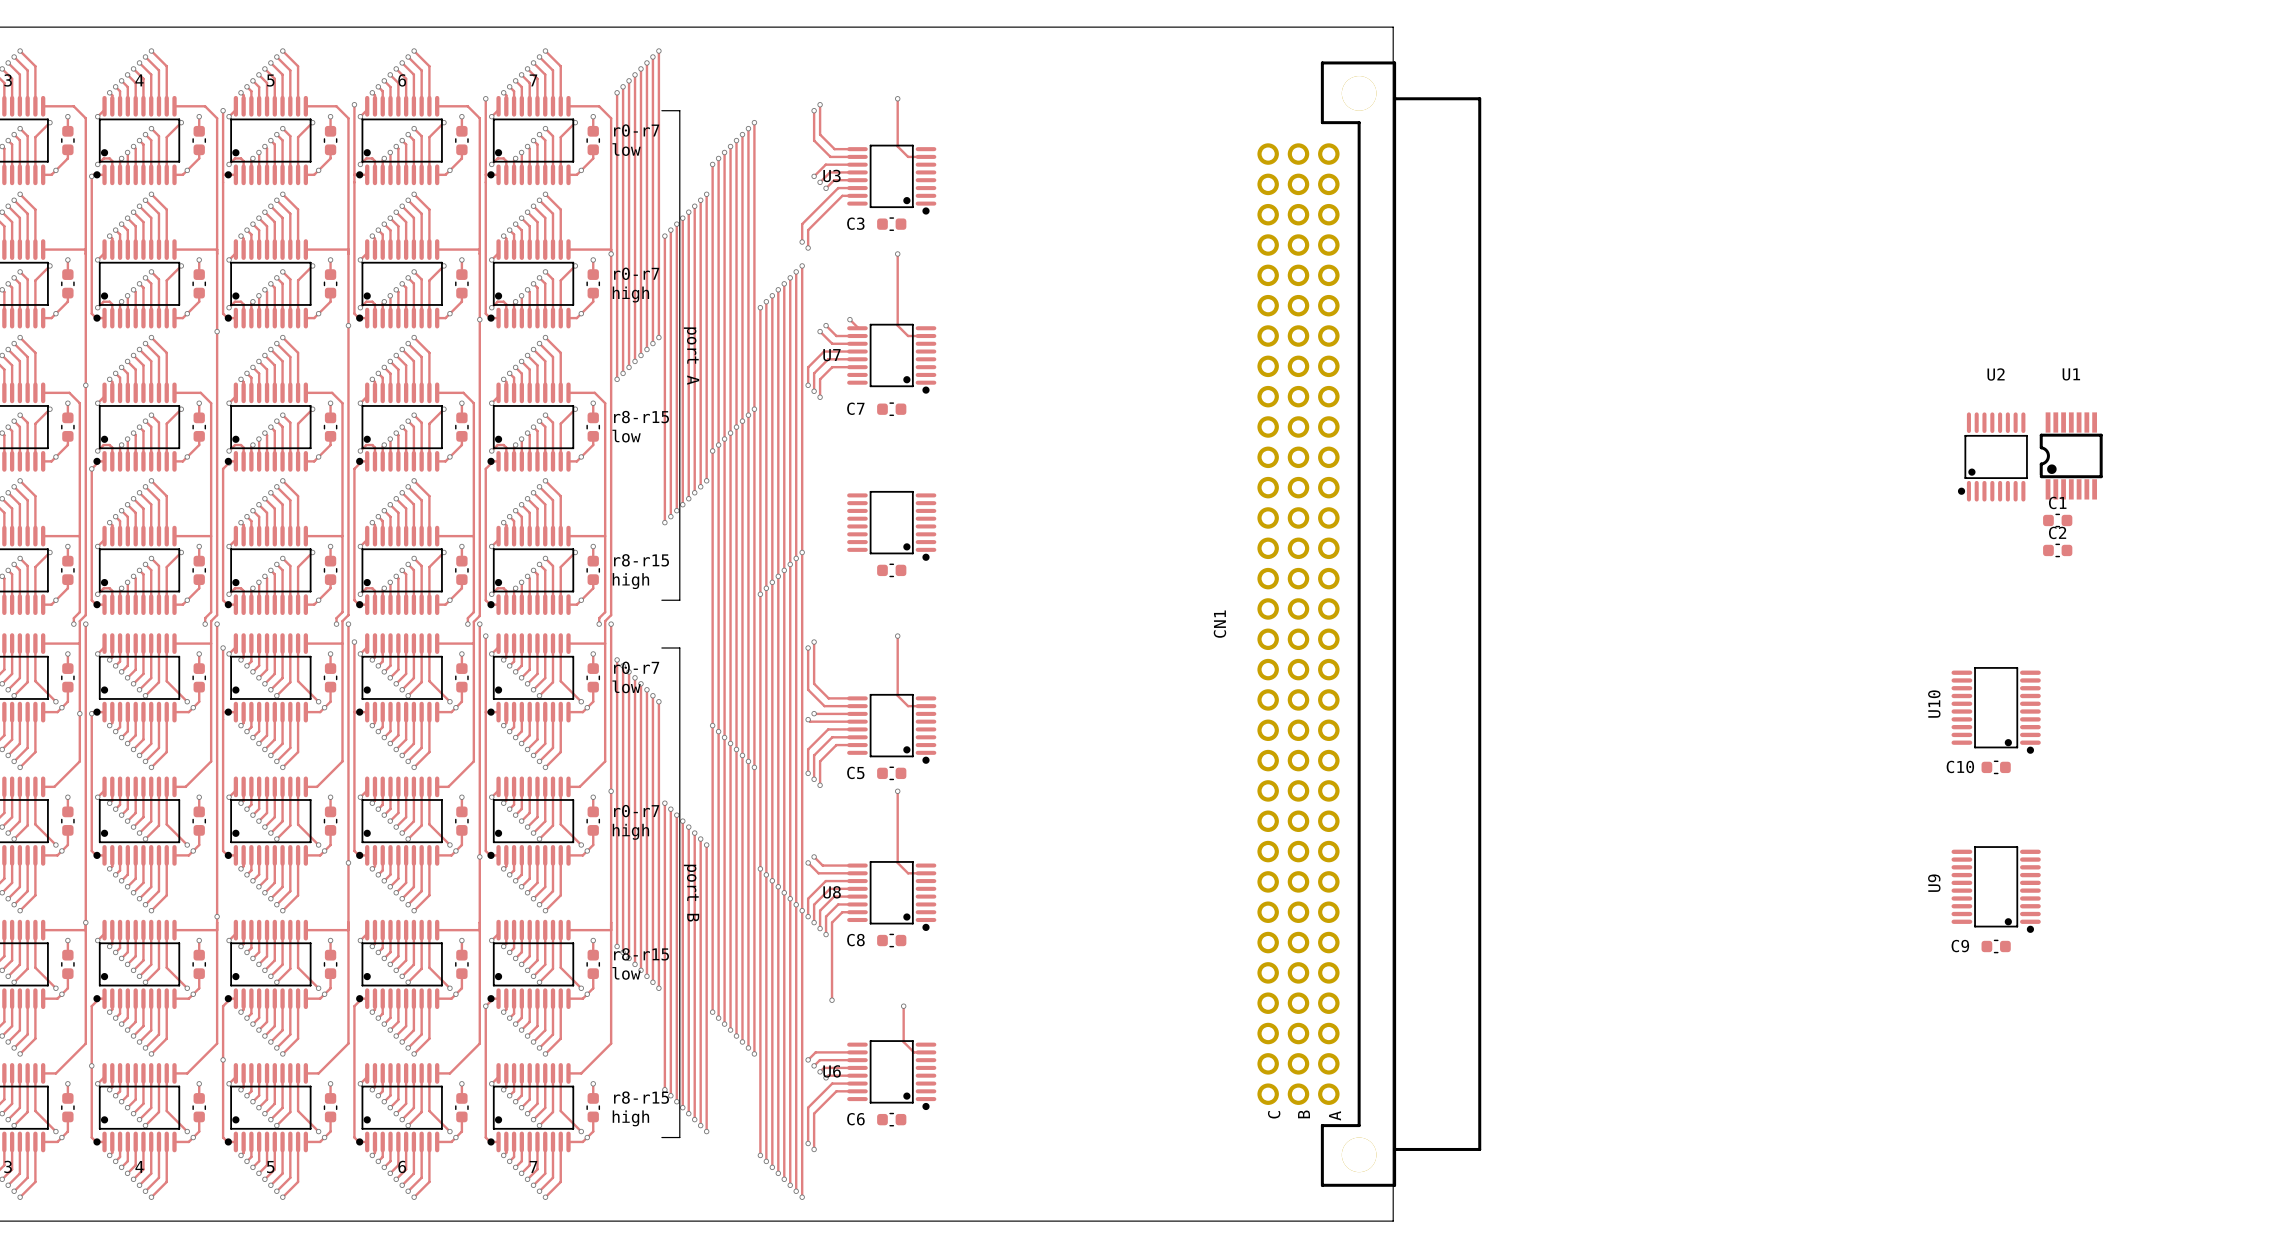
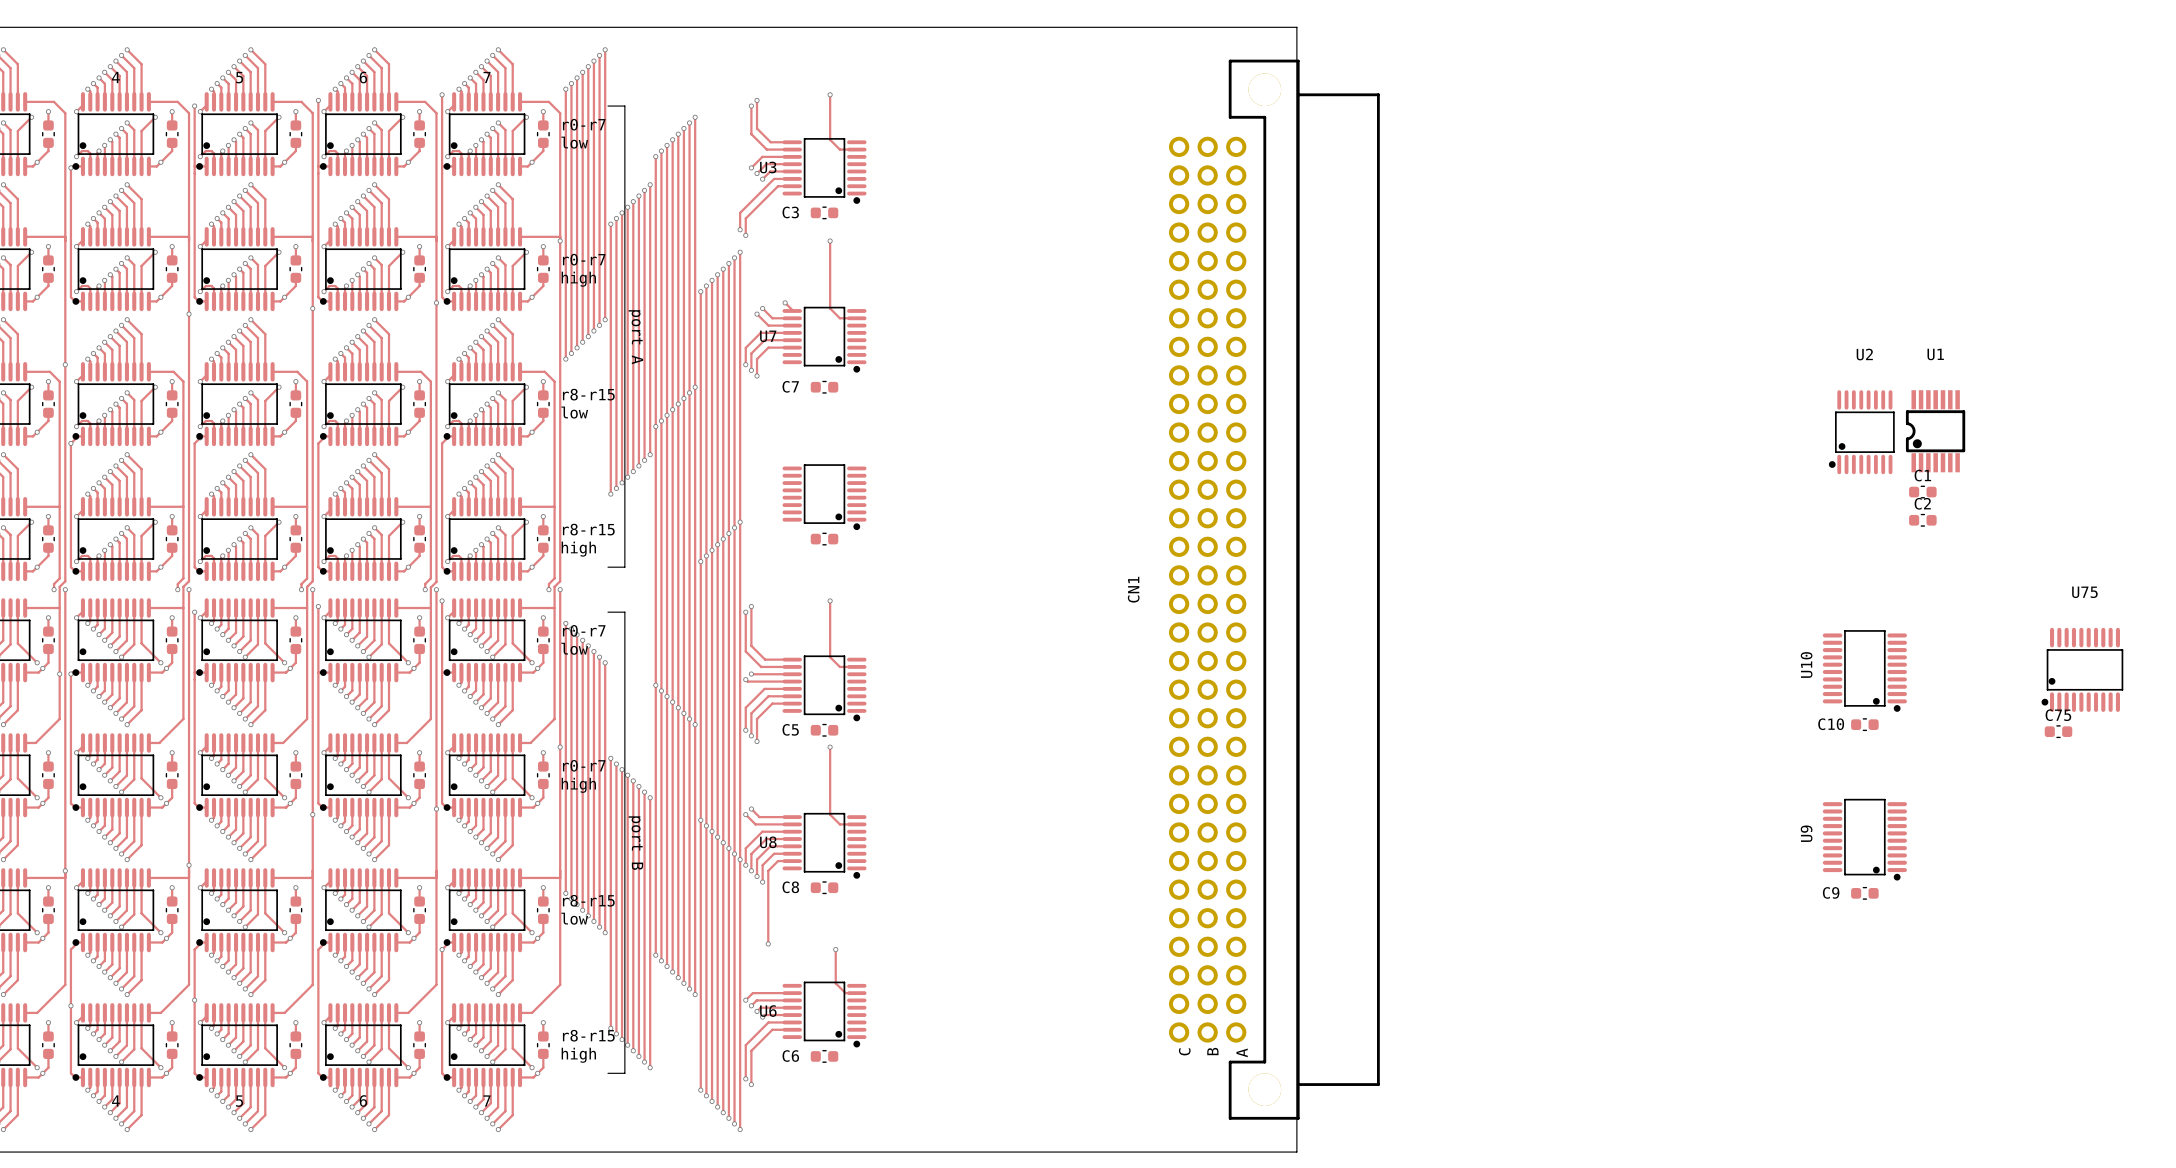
U75: none -> (2082, 669)
C75: none -> (2058, 731)

